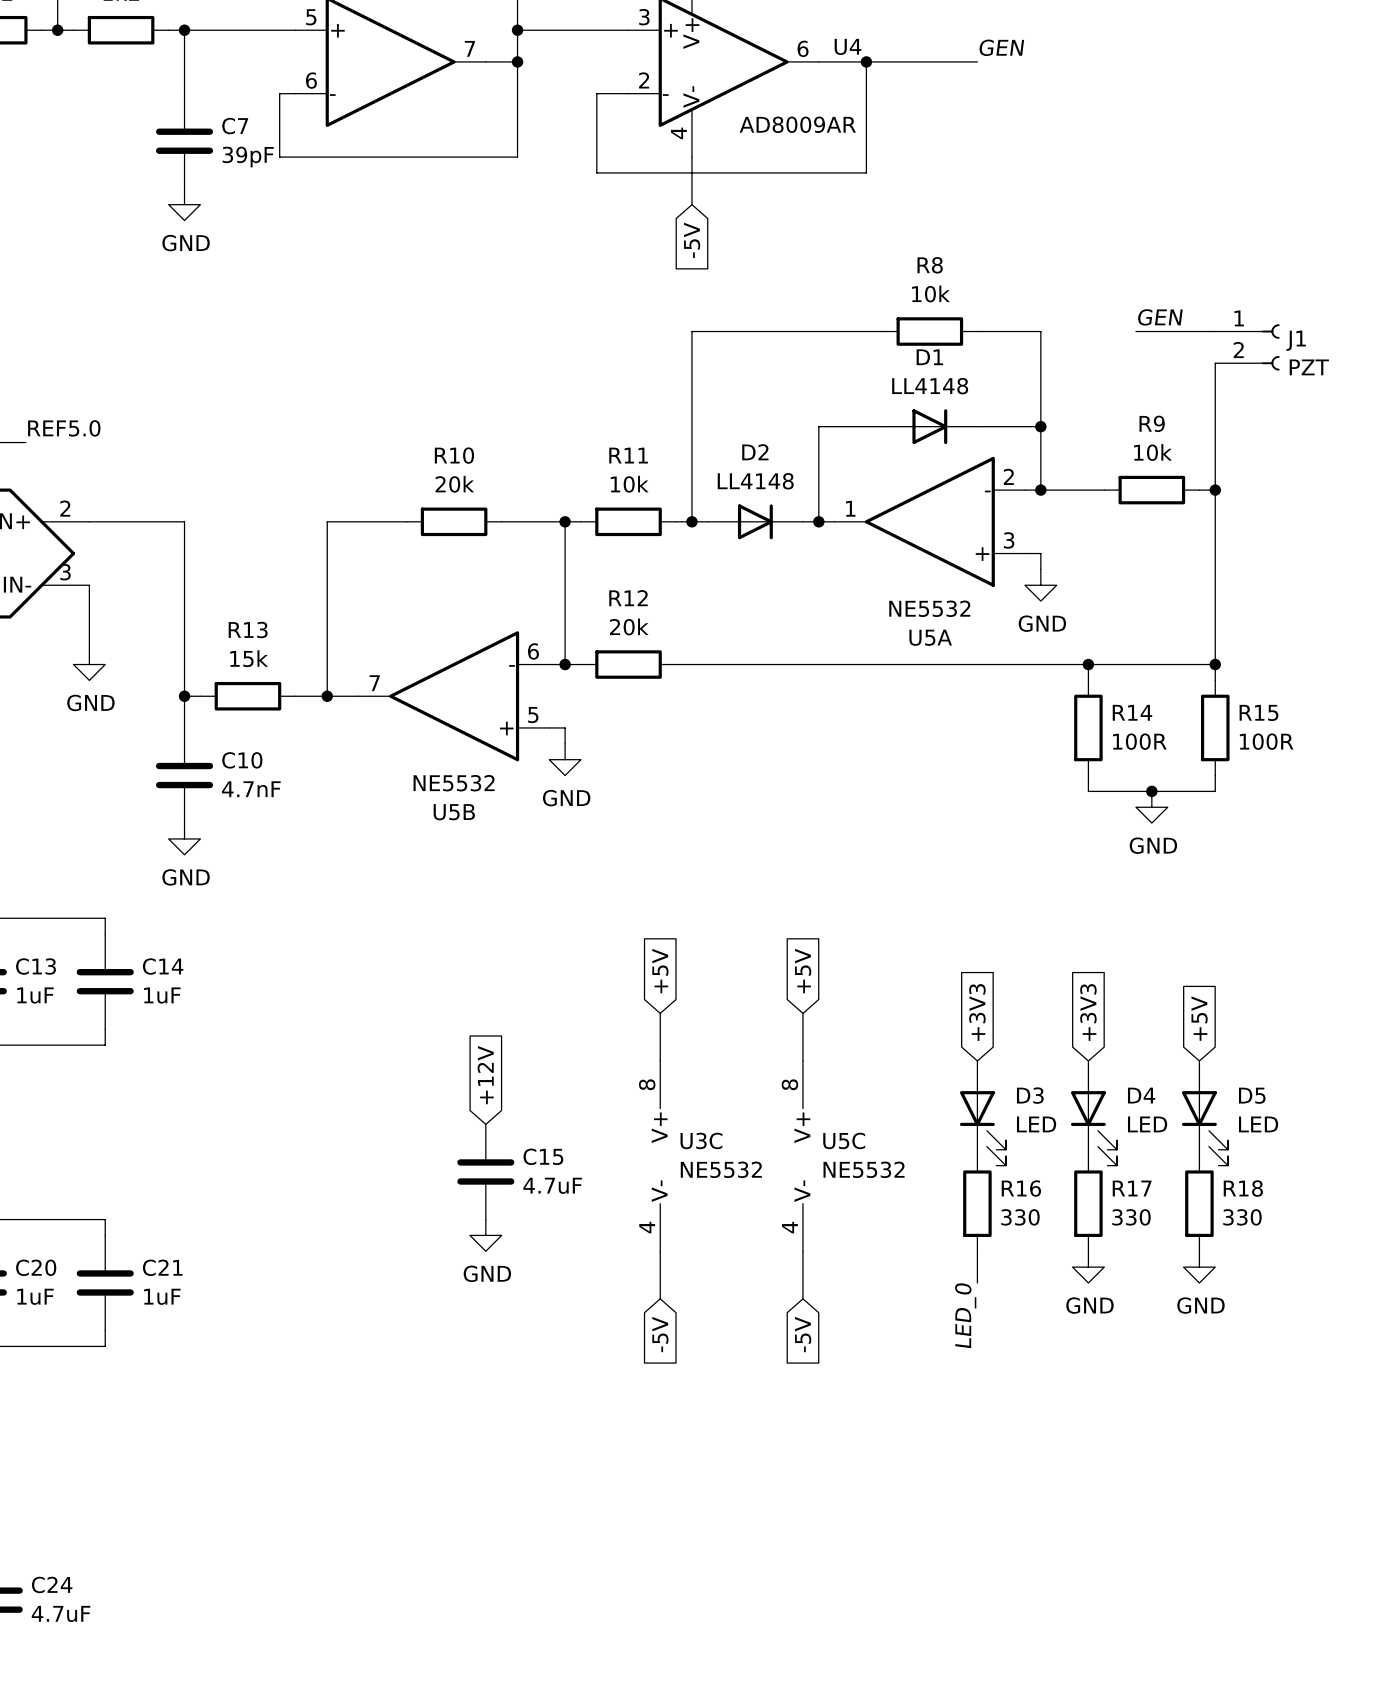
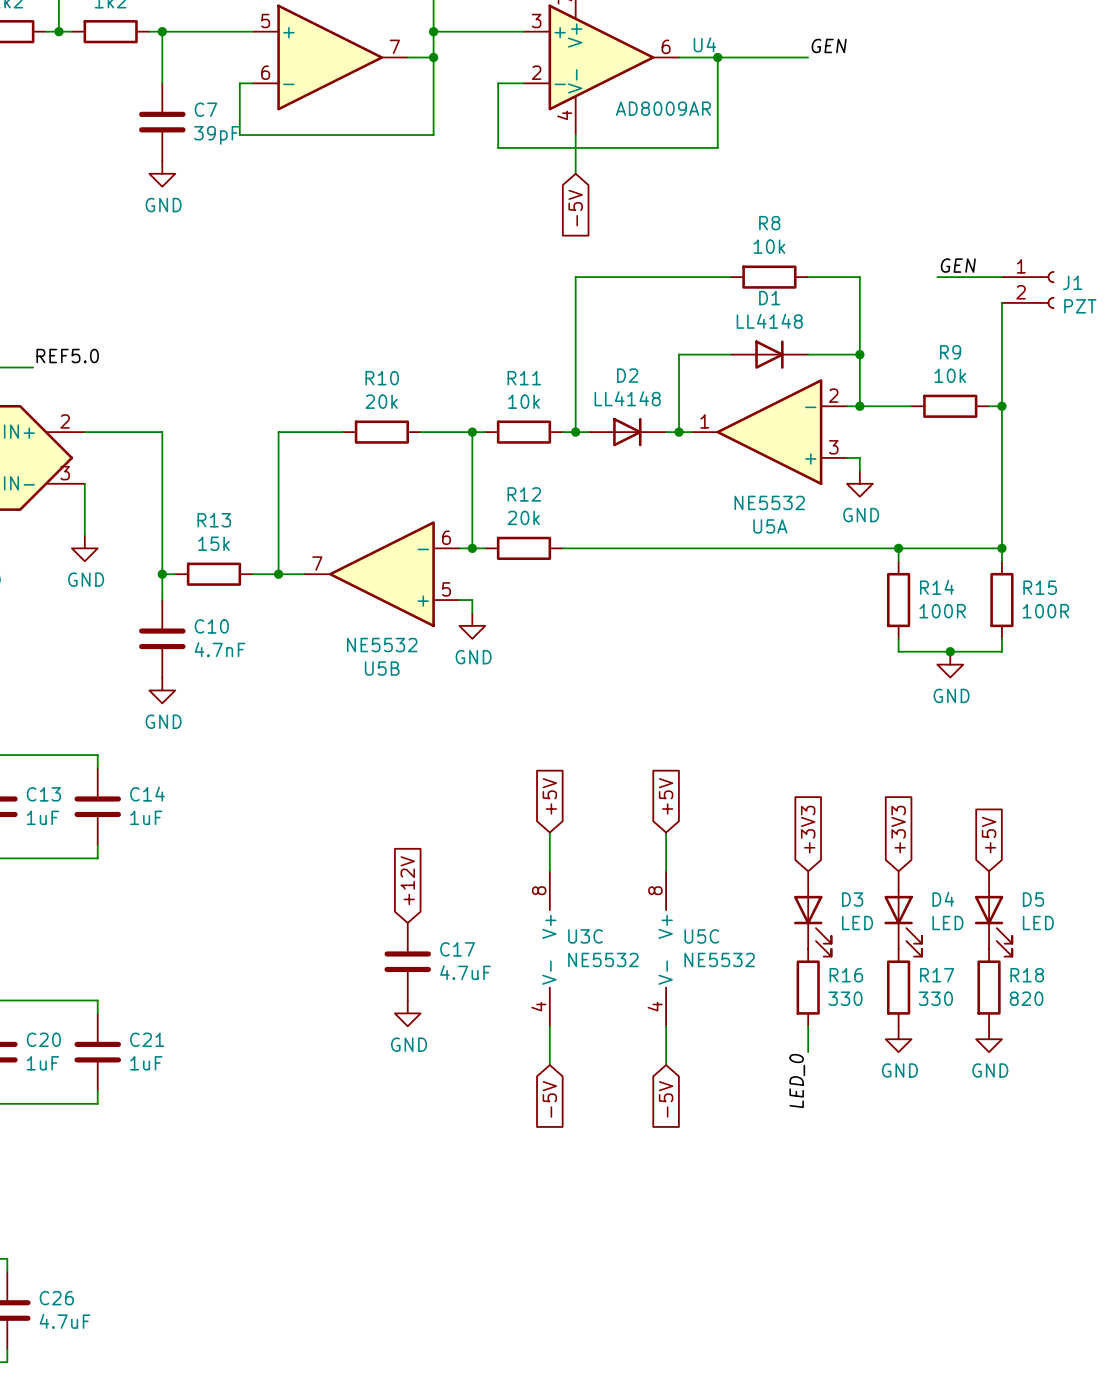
C15 name: C15 (543, 1156) -> C17 (457, 949)
R18 value: 330 (1242, 1217) -> 820 (1026, 998)
C24 name: C24 (52, 1584) -> C26 (56, 1298)

